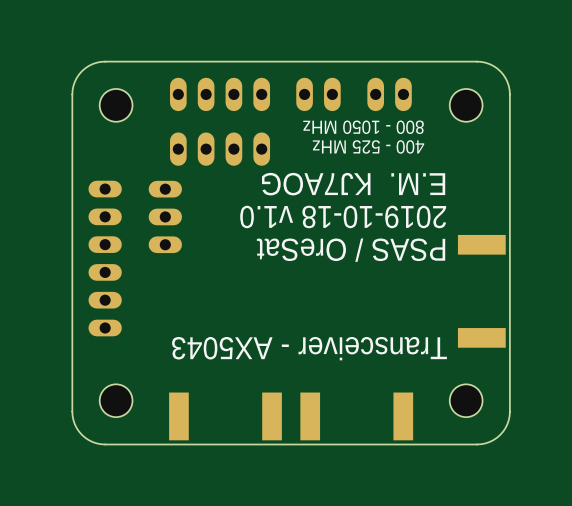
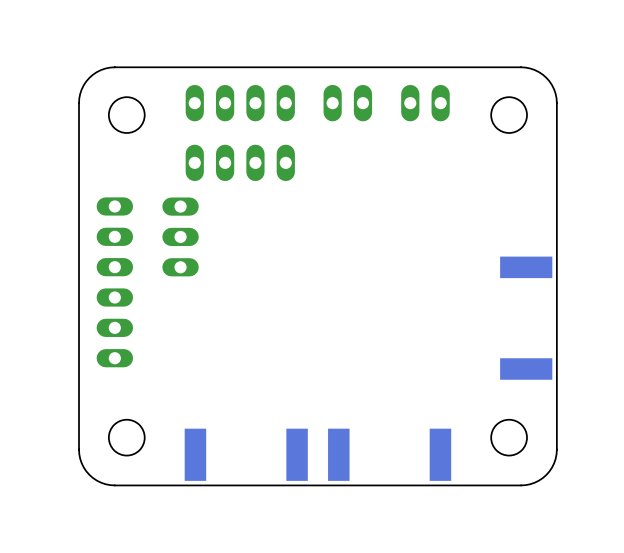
text: 800 - 1050 MHz (363, 127) -> none
text: 400 - 525 MHz (368, 146) -> none
text: E.M. KJ7AOG (353, 184) -> none
text: 2019-10-18 v1.0 (343, 216) -> none
text: PSAS / OreSat (351, 250) -> none
text: Transceiver - AX5043 (309, 348) -> none

